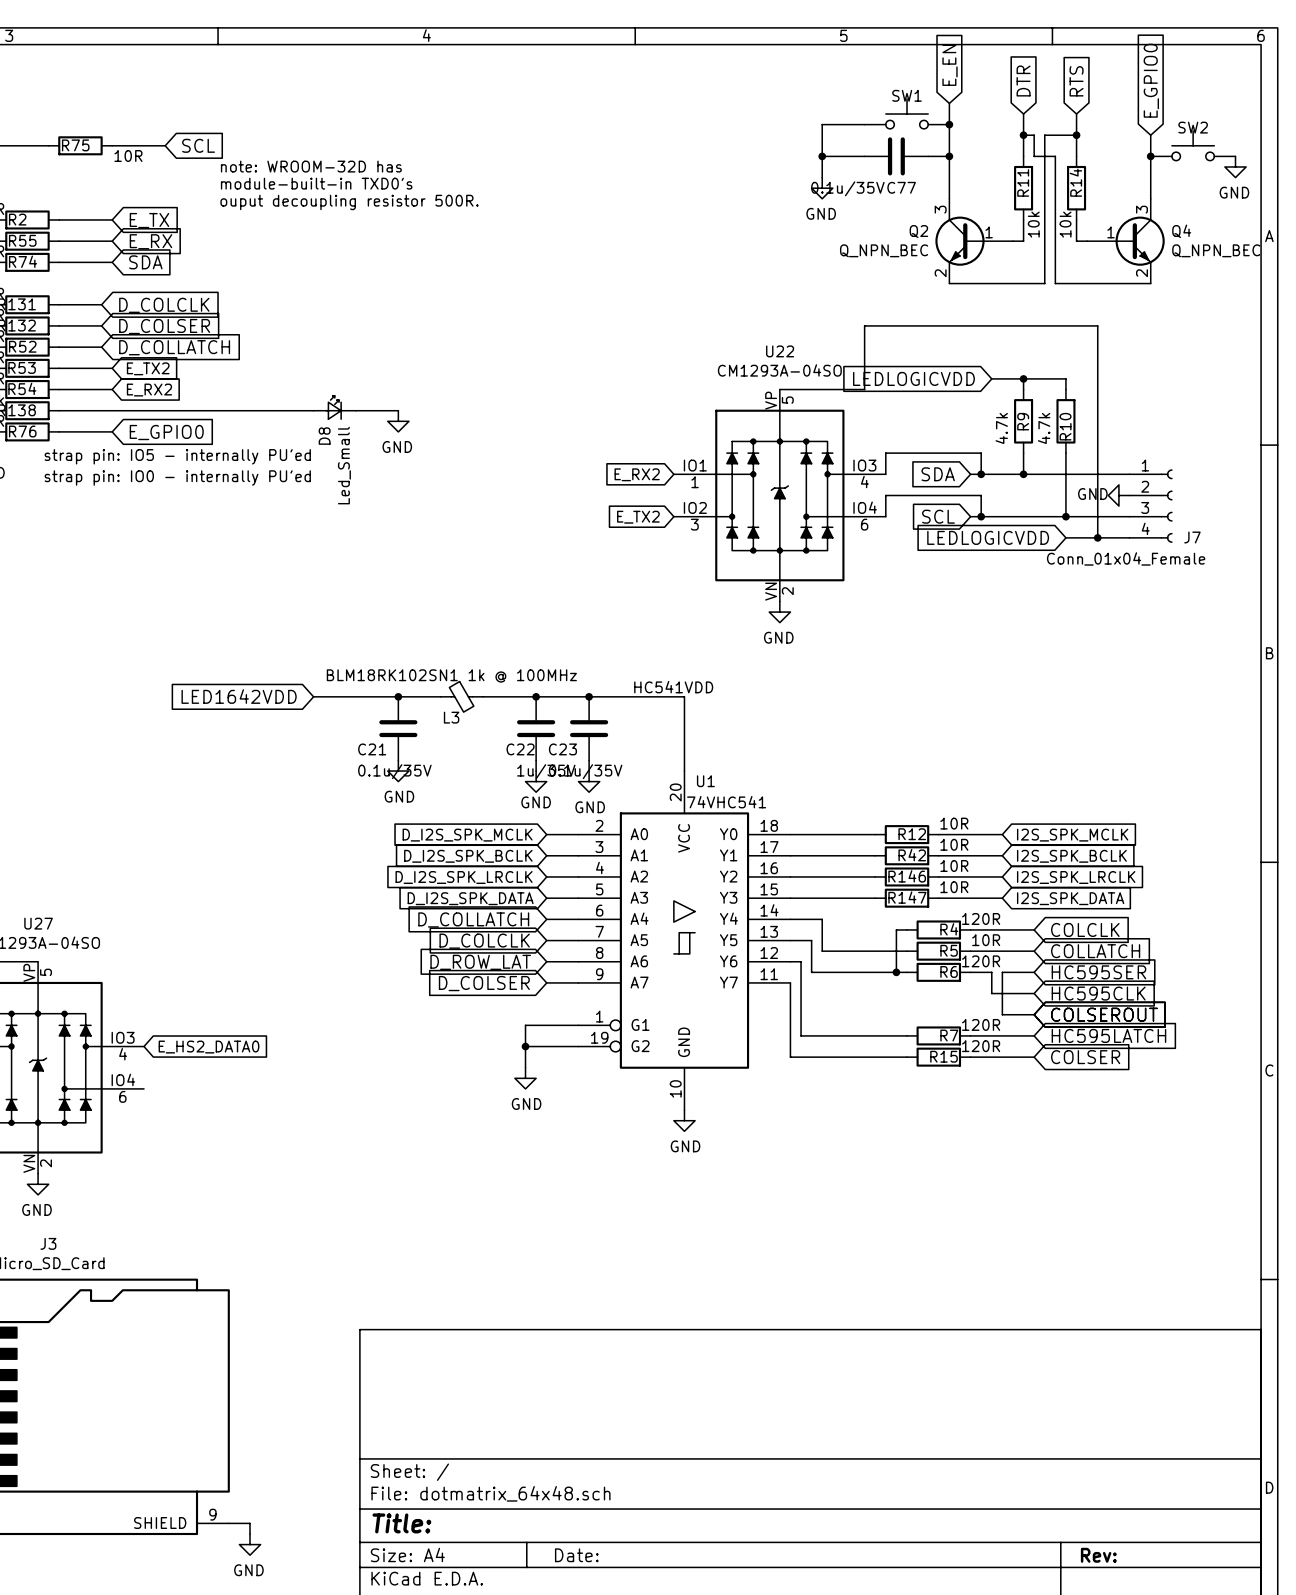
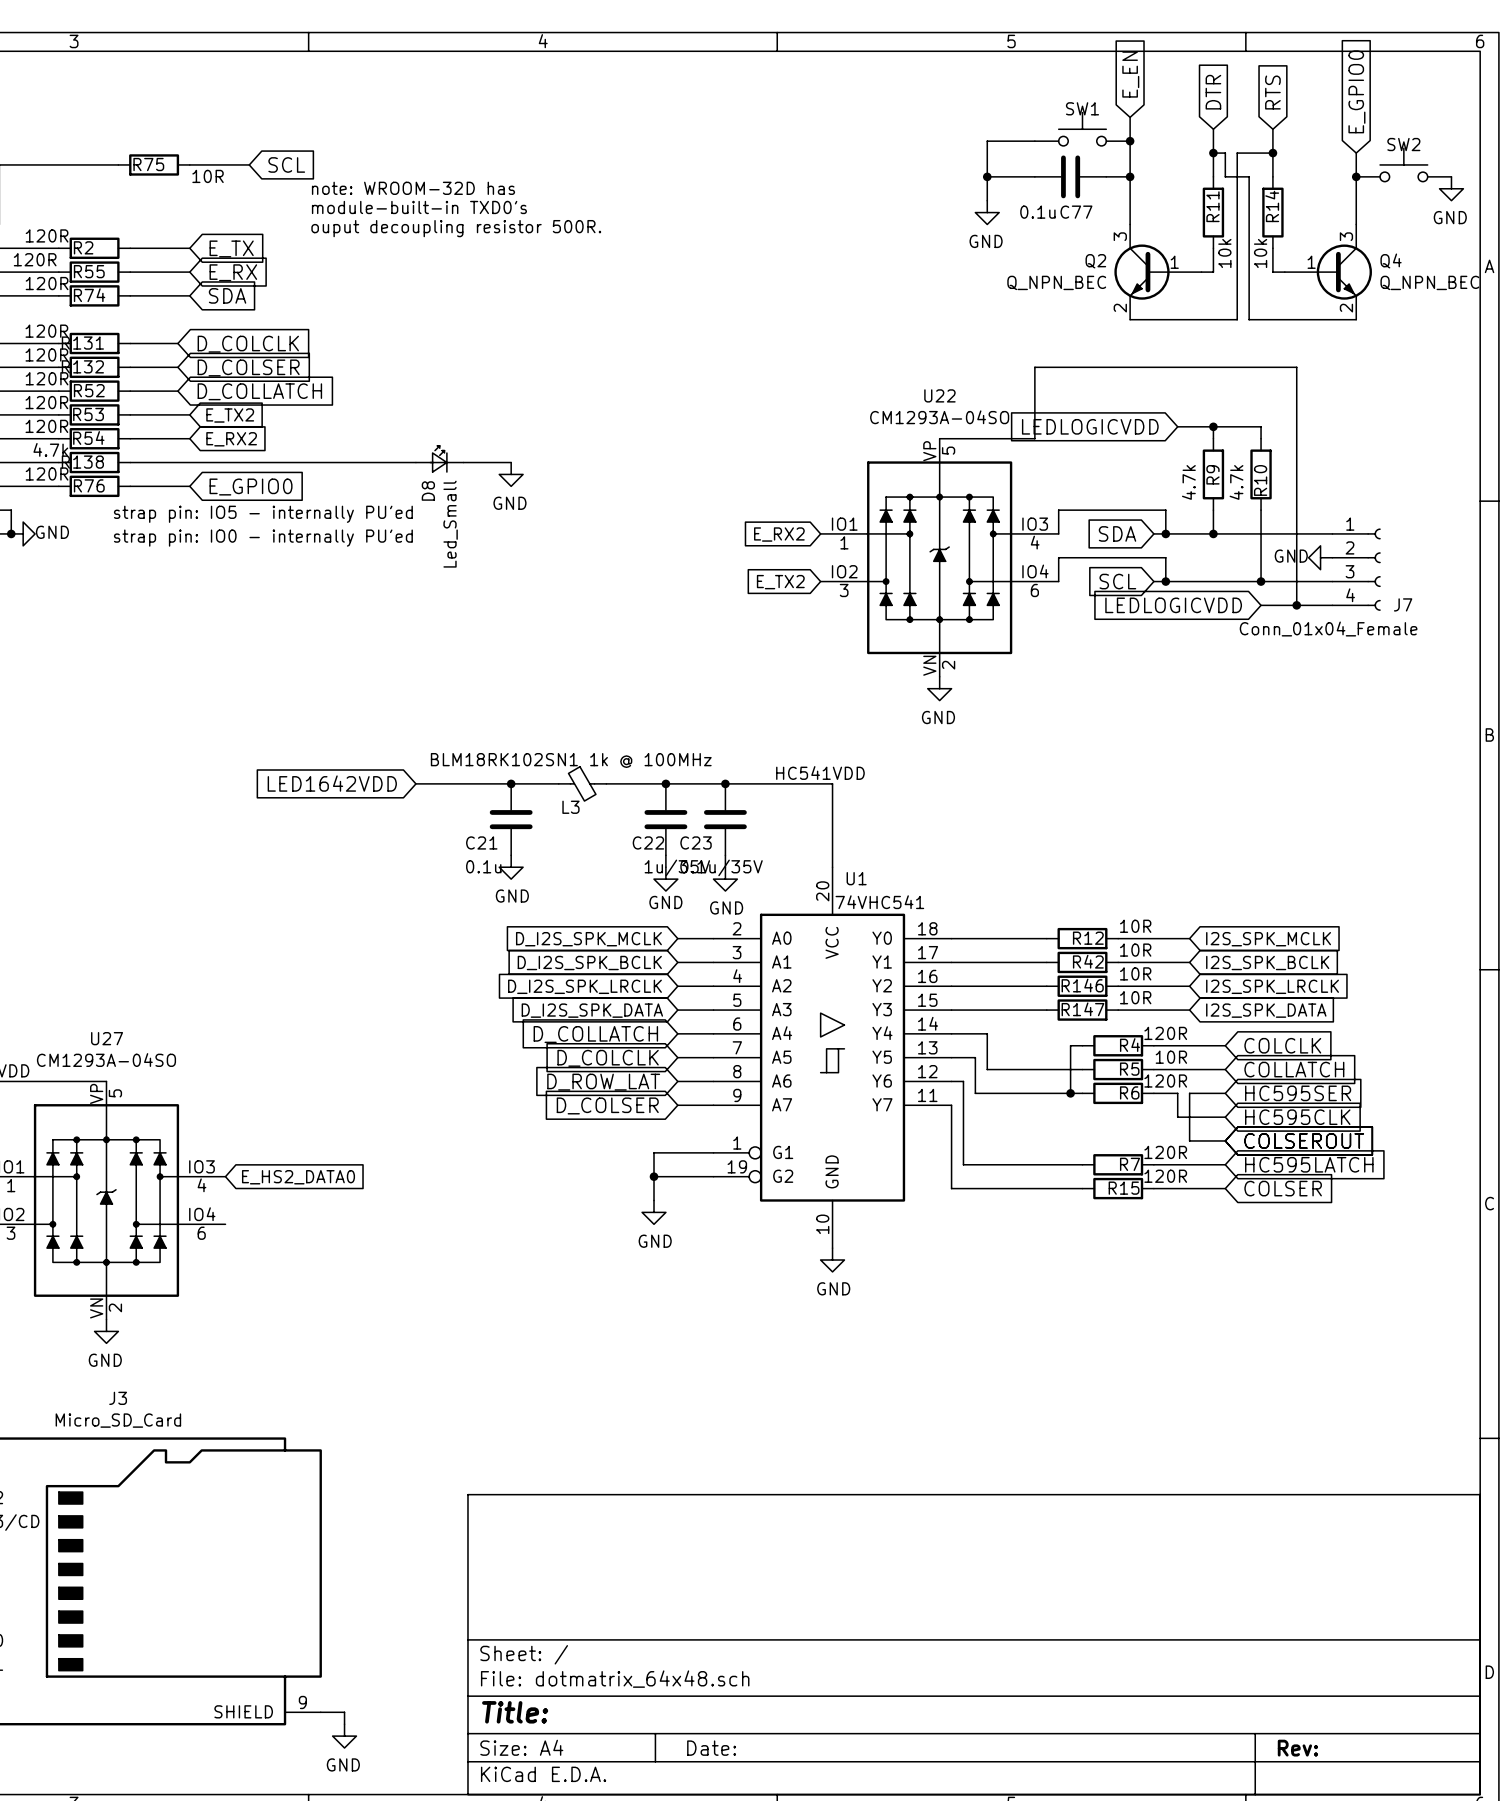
C77 value: 0.1u/35V (847, 188) -> 0.1u (1037, 212)
C21 value: 0.1u/35V (394, 771) -> 0.1u (483, 866)

